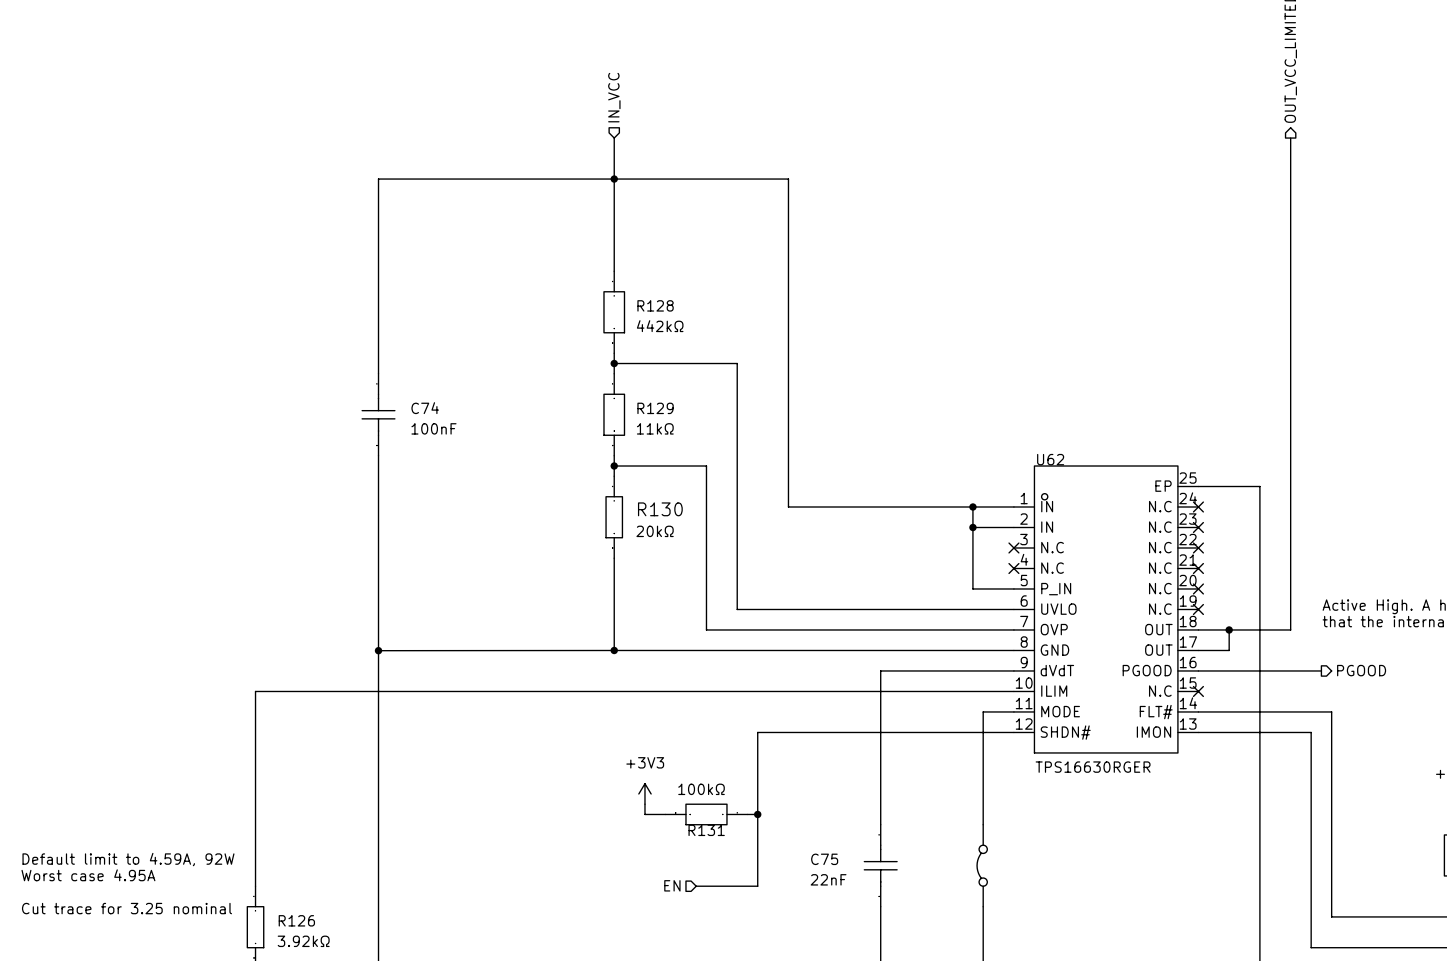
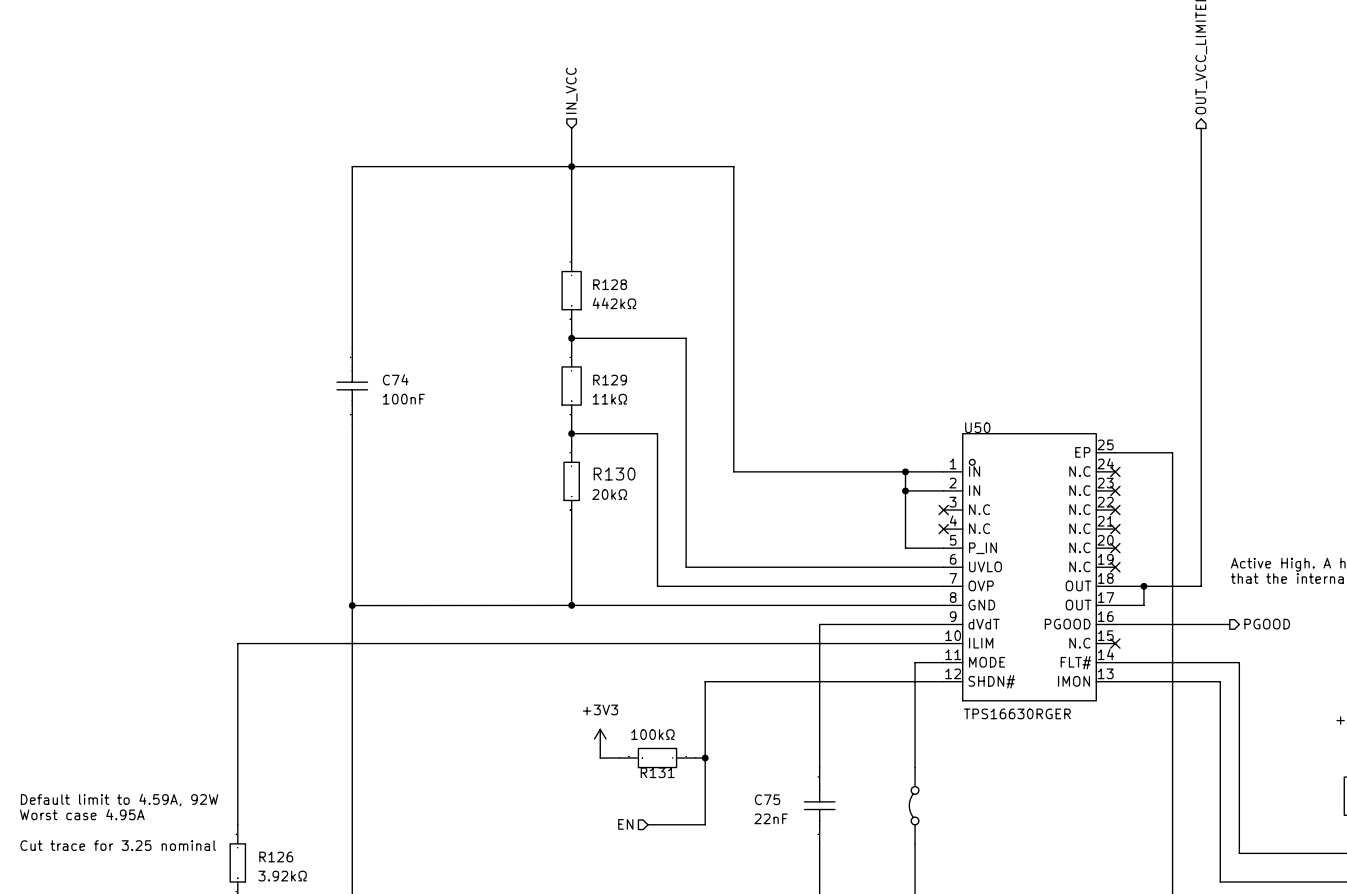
U62 name: U62 (1050, 459) -> U50 (977, 427)

